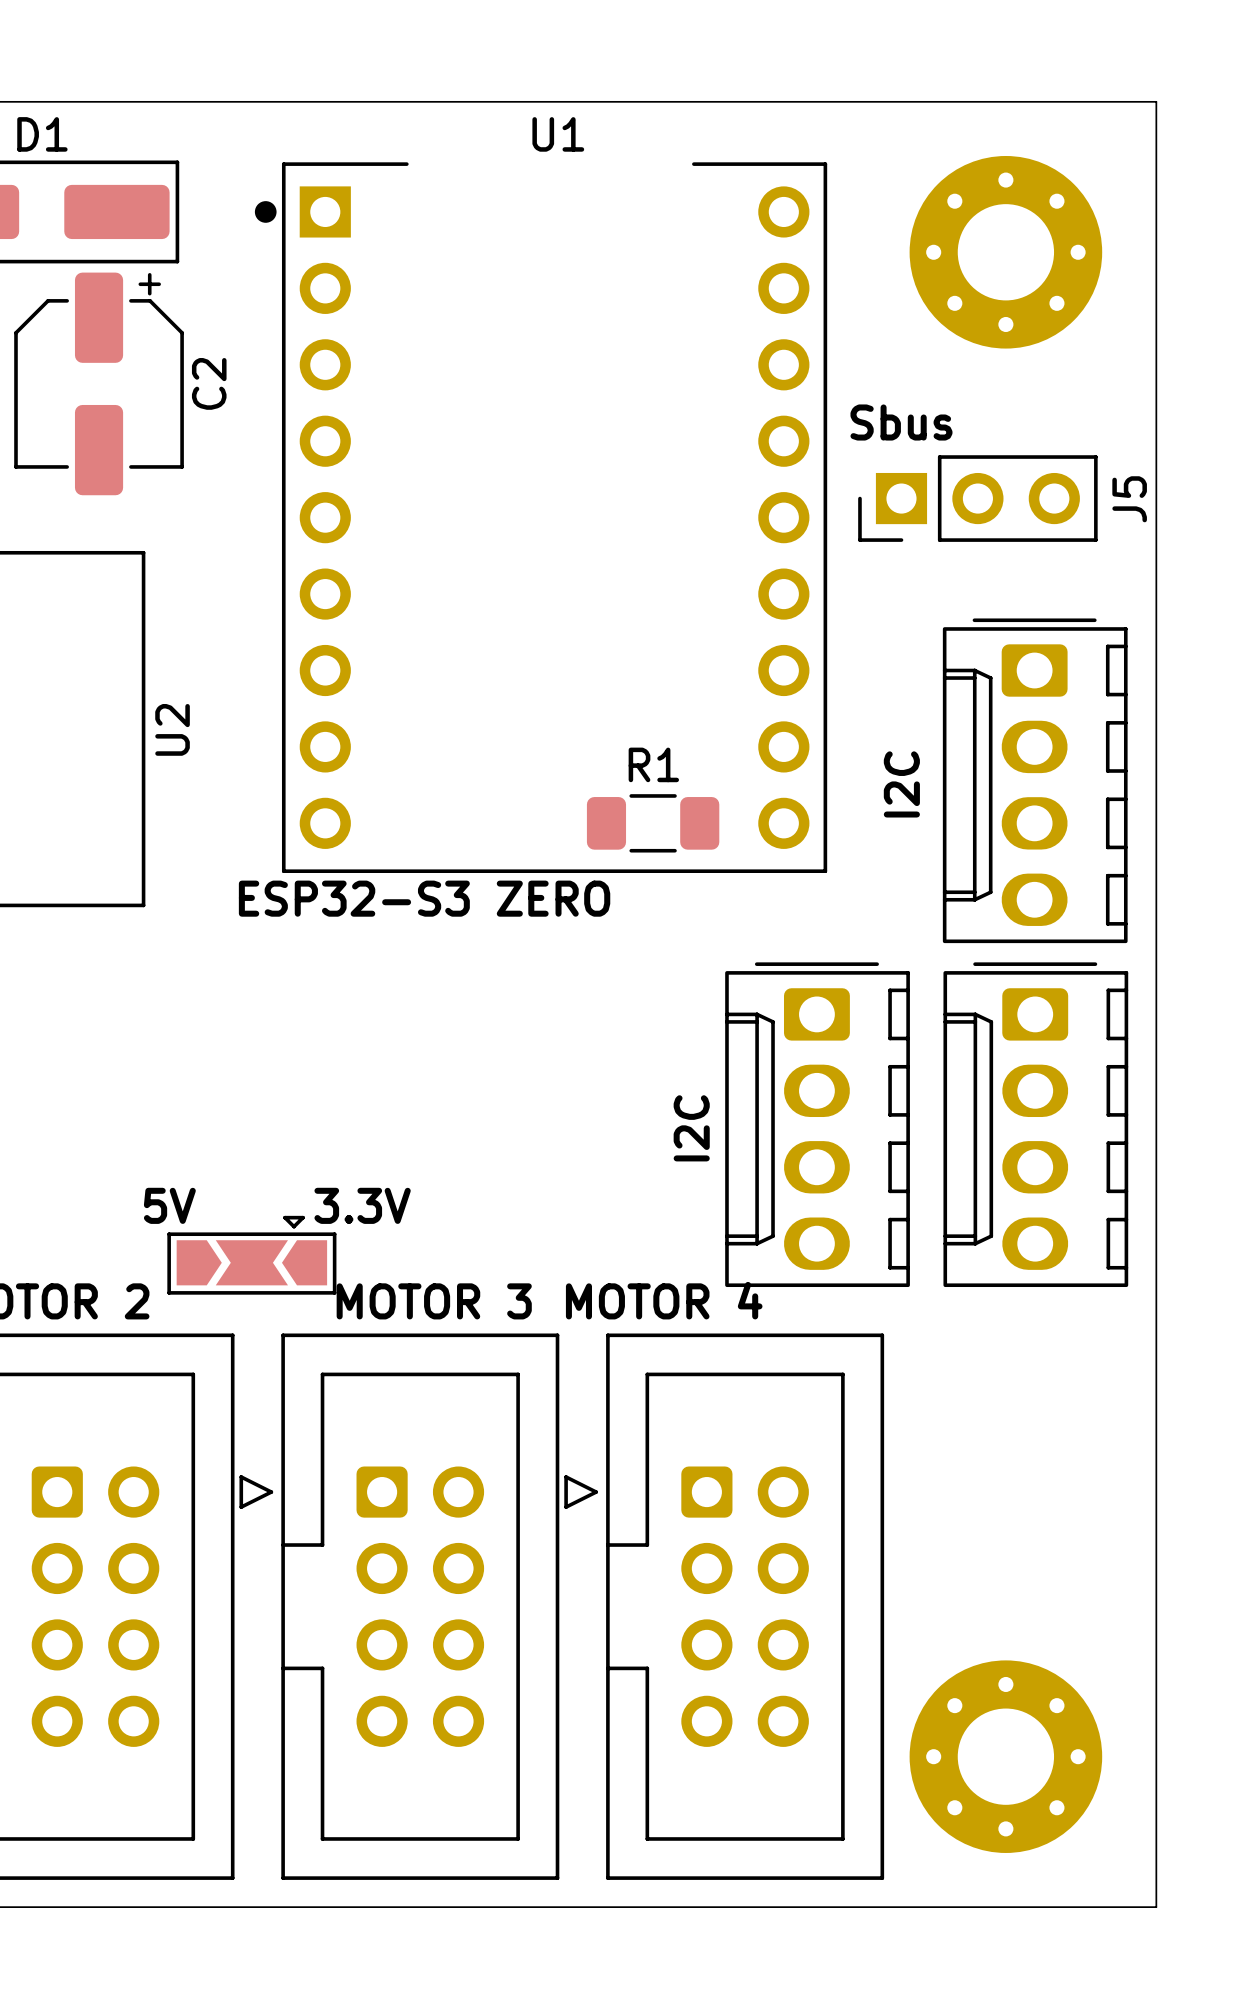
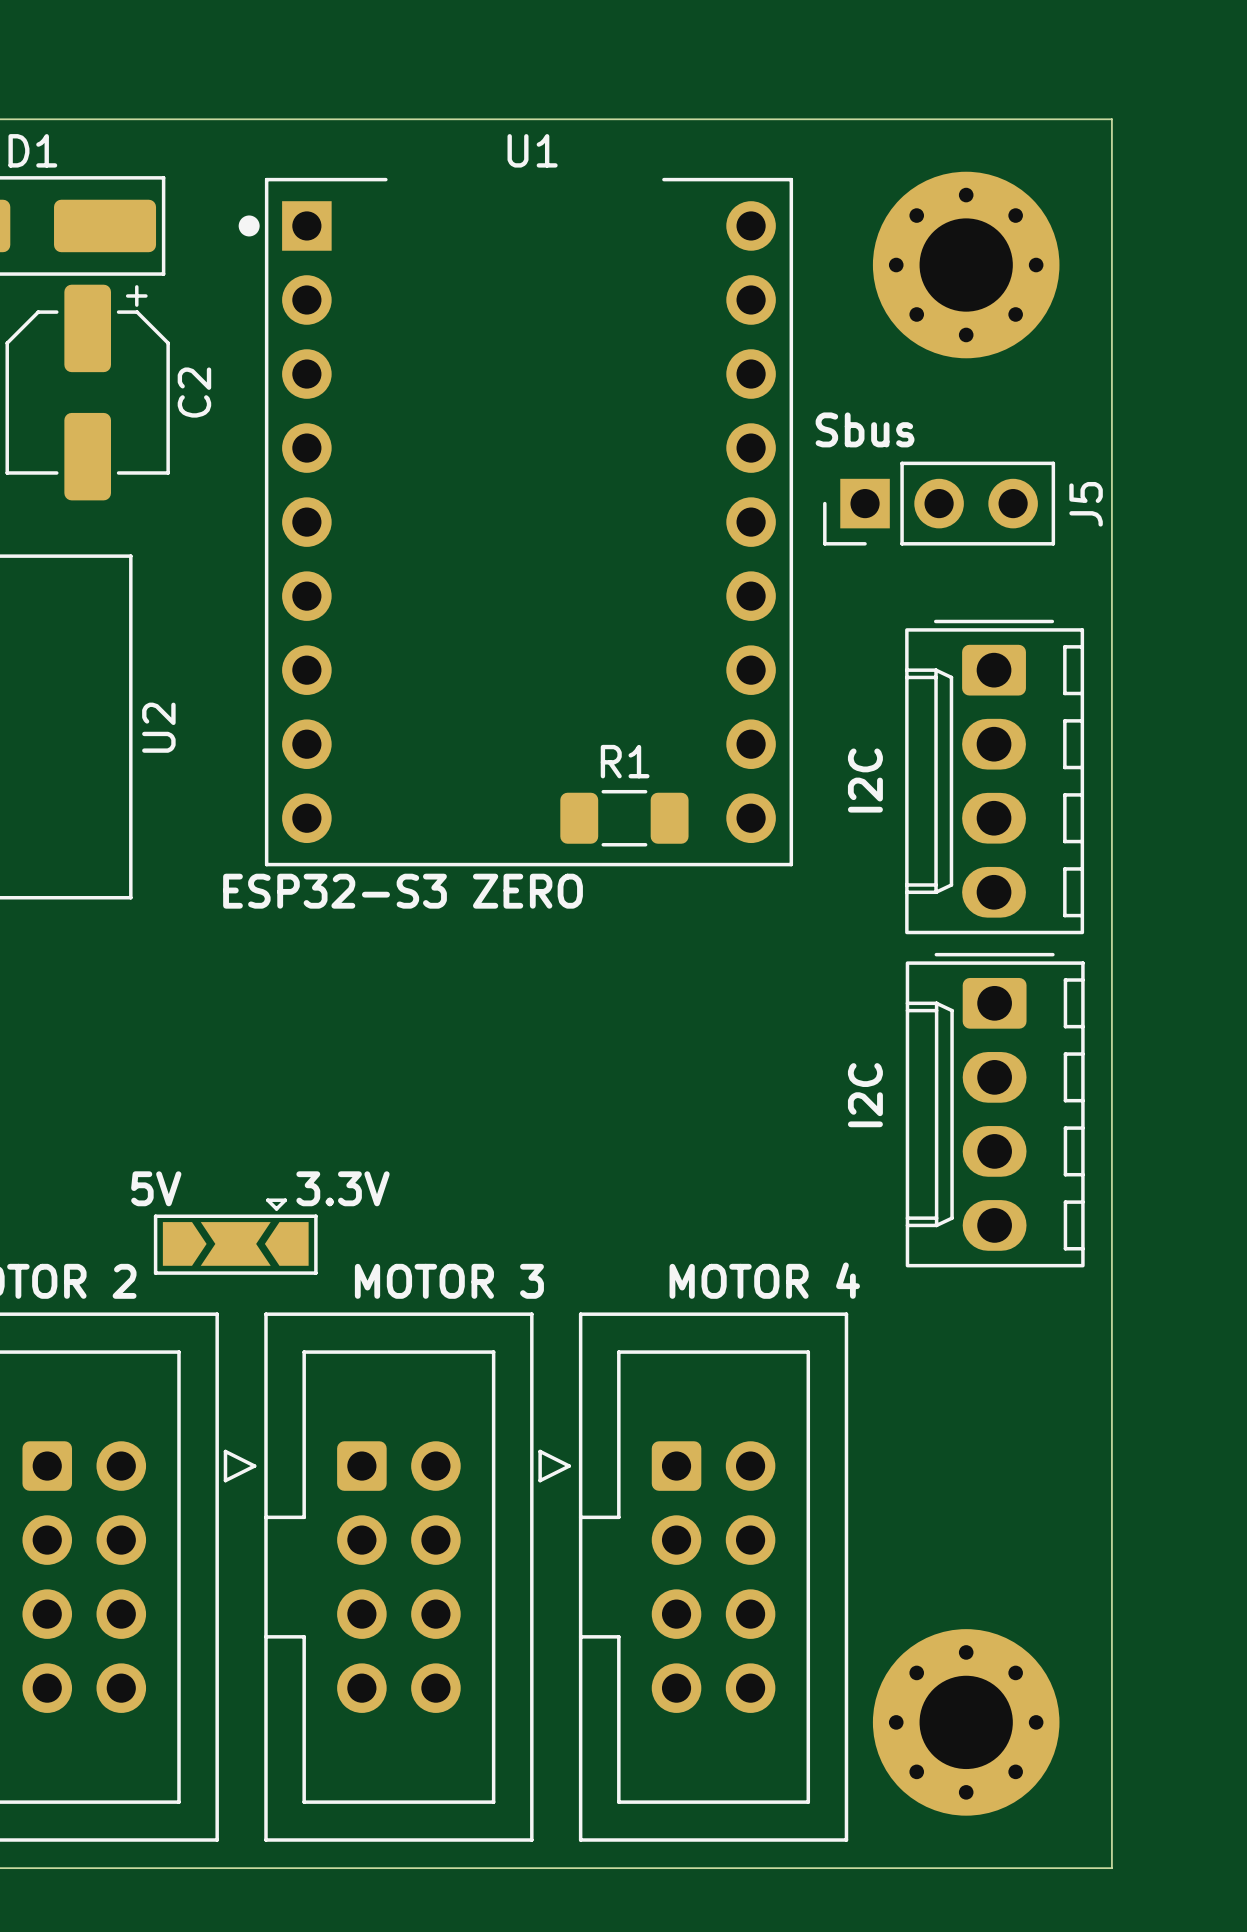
part: (817, 1124) -> none
text position: I2C (691, 1128) -> I2C (865, 1095)
text position: MOTOR 4 (664, 1300) -> MOTOR 4 (764, 1280)
text position: MOTOR 3 (434, 1301) -> MOTOR 3 (449, 1281)

